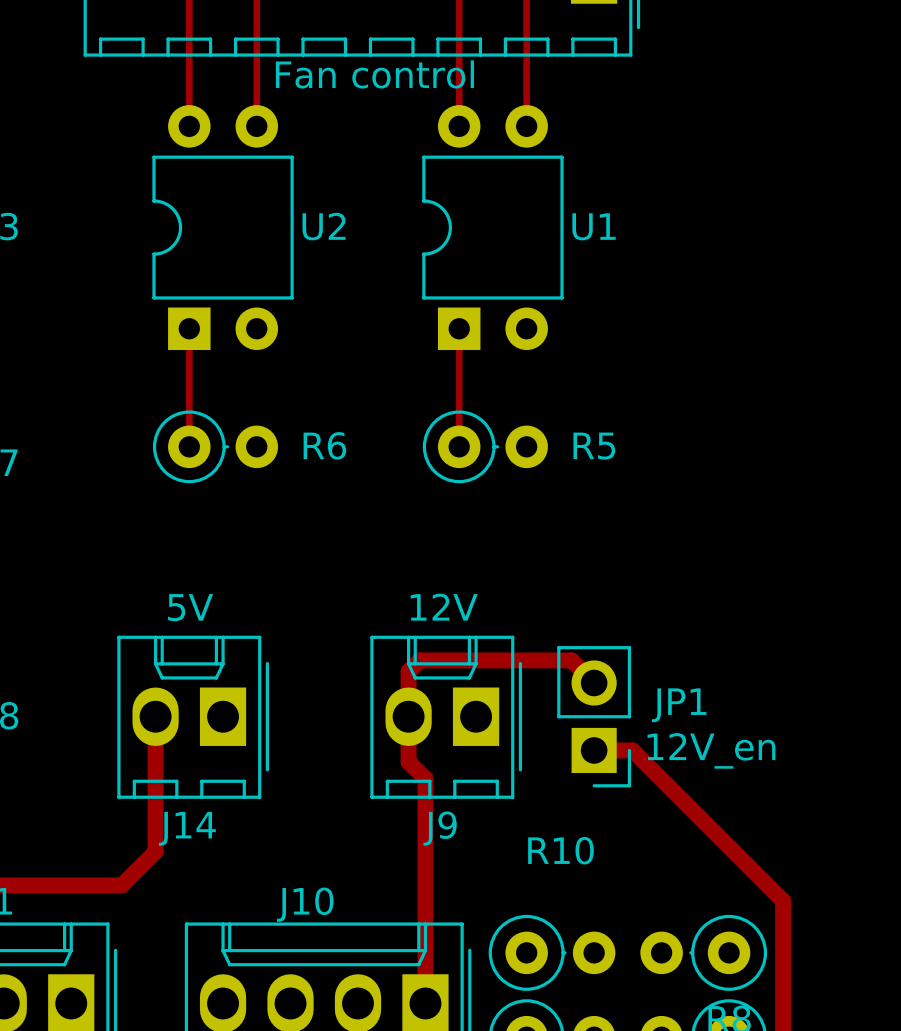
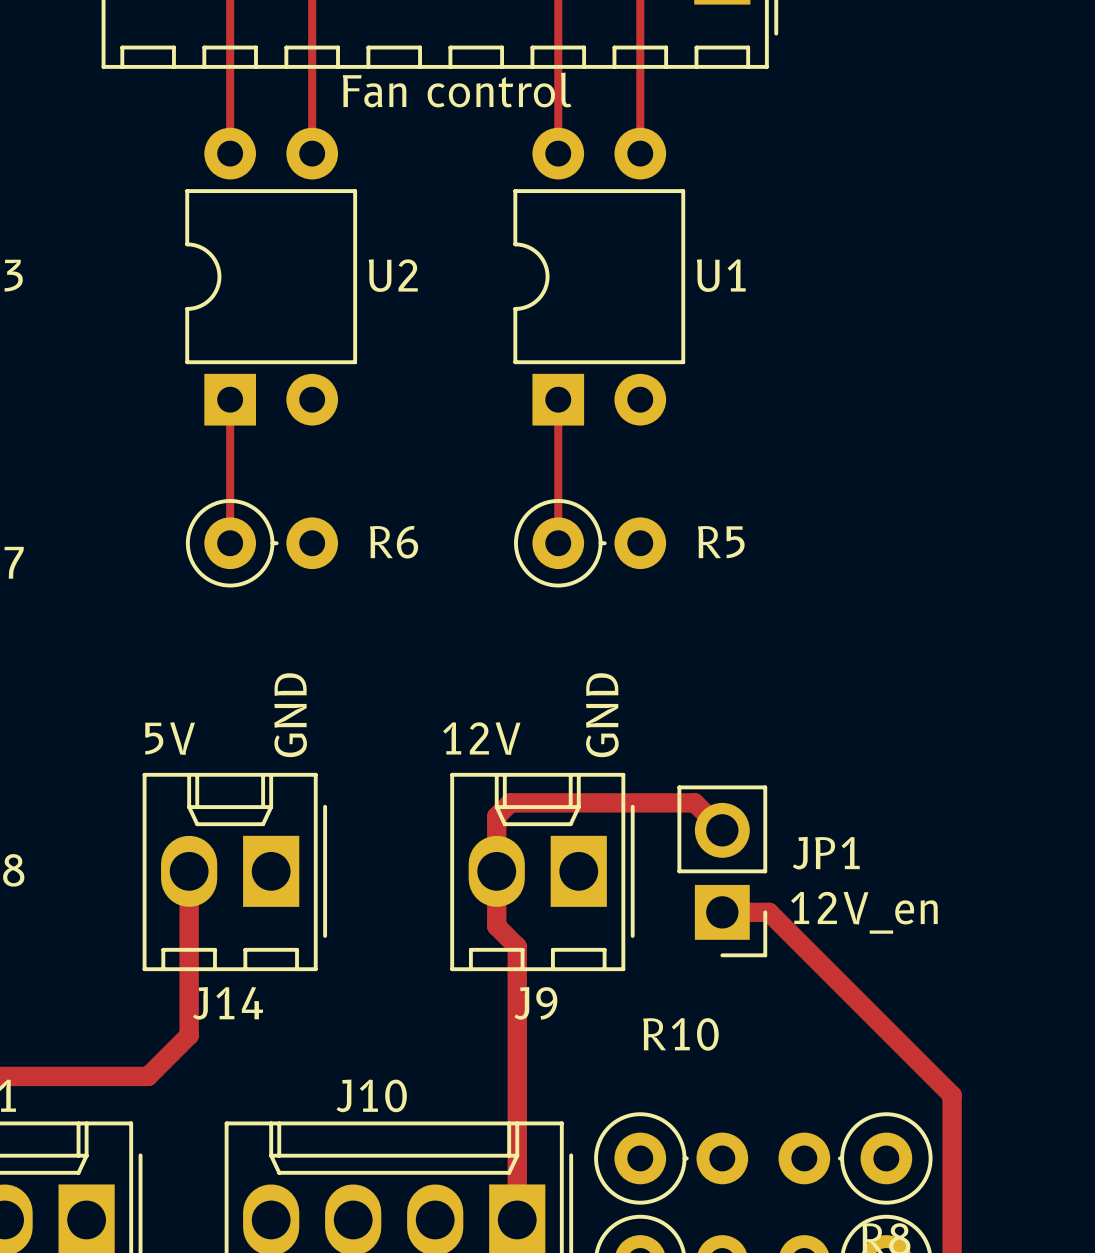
text: none -> GND (290, 715)
text: none -> GND (602, 715)
J14 value position: 5V (190, 607) -> 5V (170, 738)
J9 value position: 12V (444, 607) -> 12V (481, 738)

